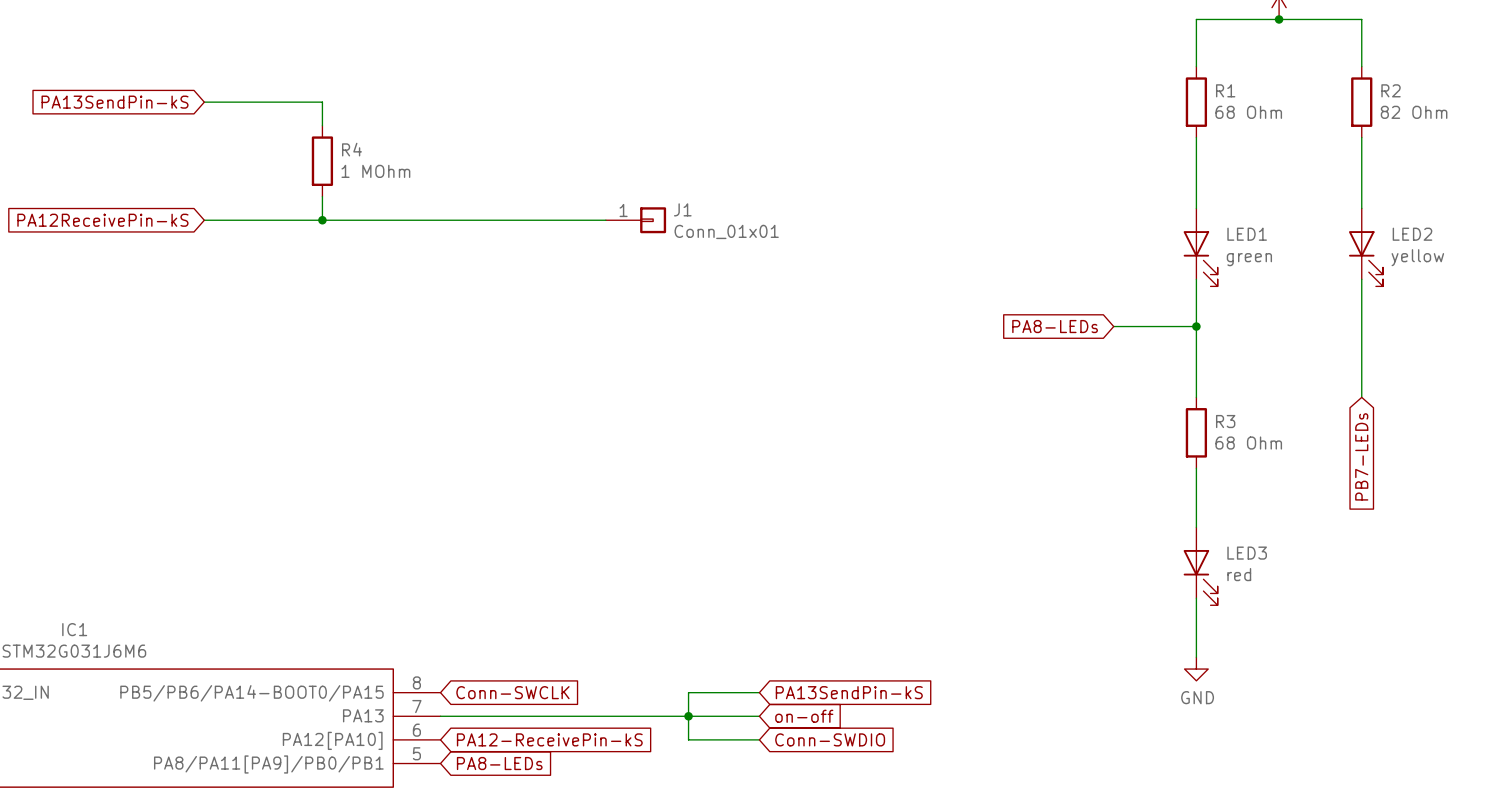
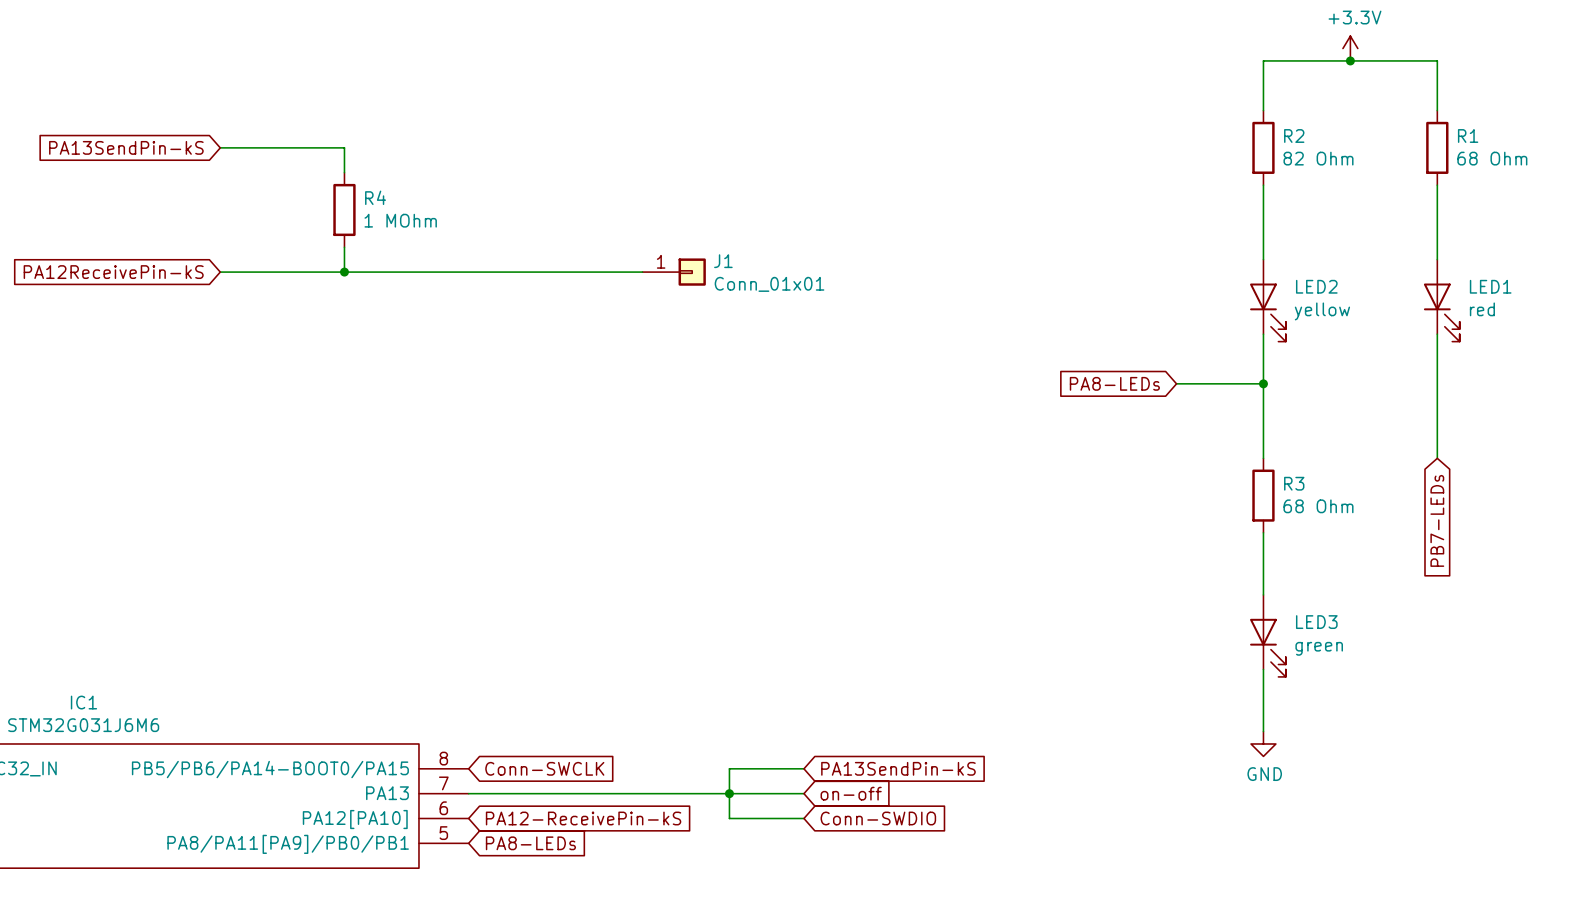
R1 name: R1 (1225, 90) -> R2 (1294, 136)
R2 name: R2 (1391, 90) -> R1 (1468, 136)
R1 value: 68 Ohm (1248, 112) -> 82 Ohm (1318, 158)
R2 value: 82 Ohm (1414, 112) -> 68 Ohm (1492, 158)
LED1 name: LED1 (1247, 234) -> LED2 (1316, 286)
LED2 name: LED2 (1412, 234) -> LED1 (1490, 286)
LED2 value: yellow (1417, 257) -> red (1482, 309)
LED1 value: green (1249, 259) -> yellow (1322, 311)
LED3 value: red (1239, 574) -> green (1319, 648)

